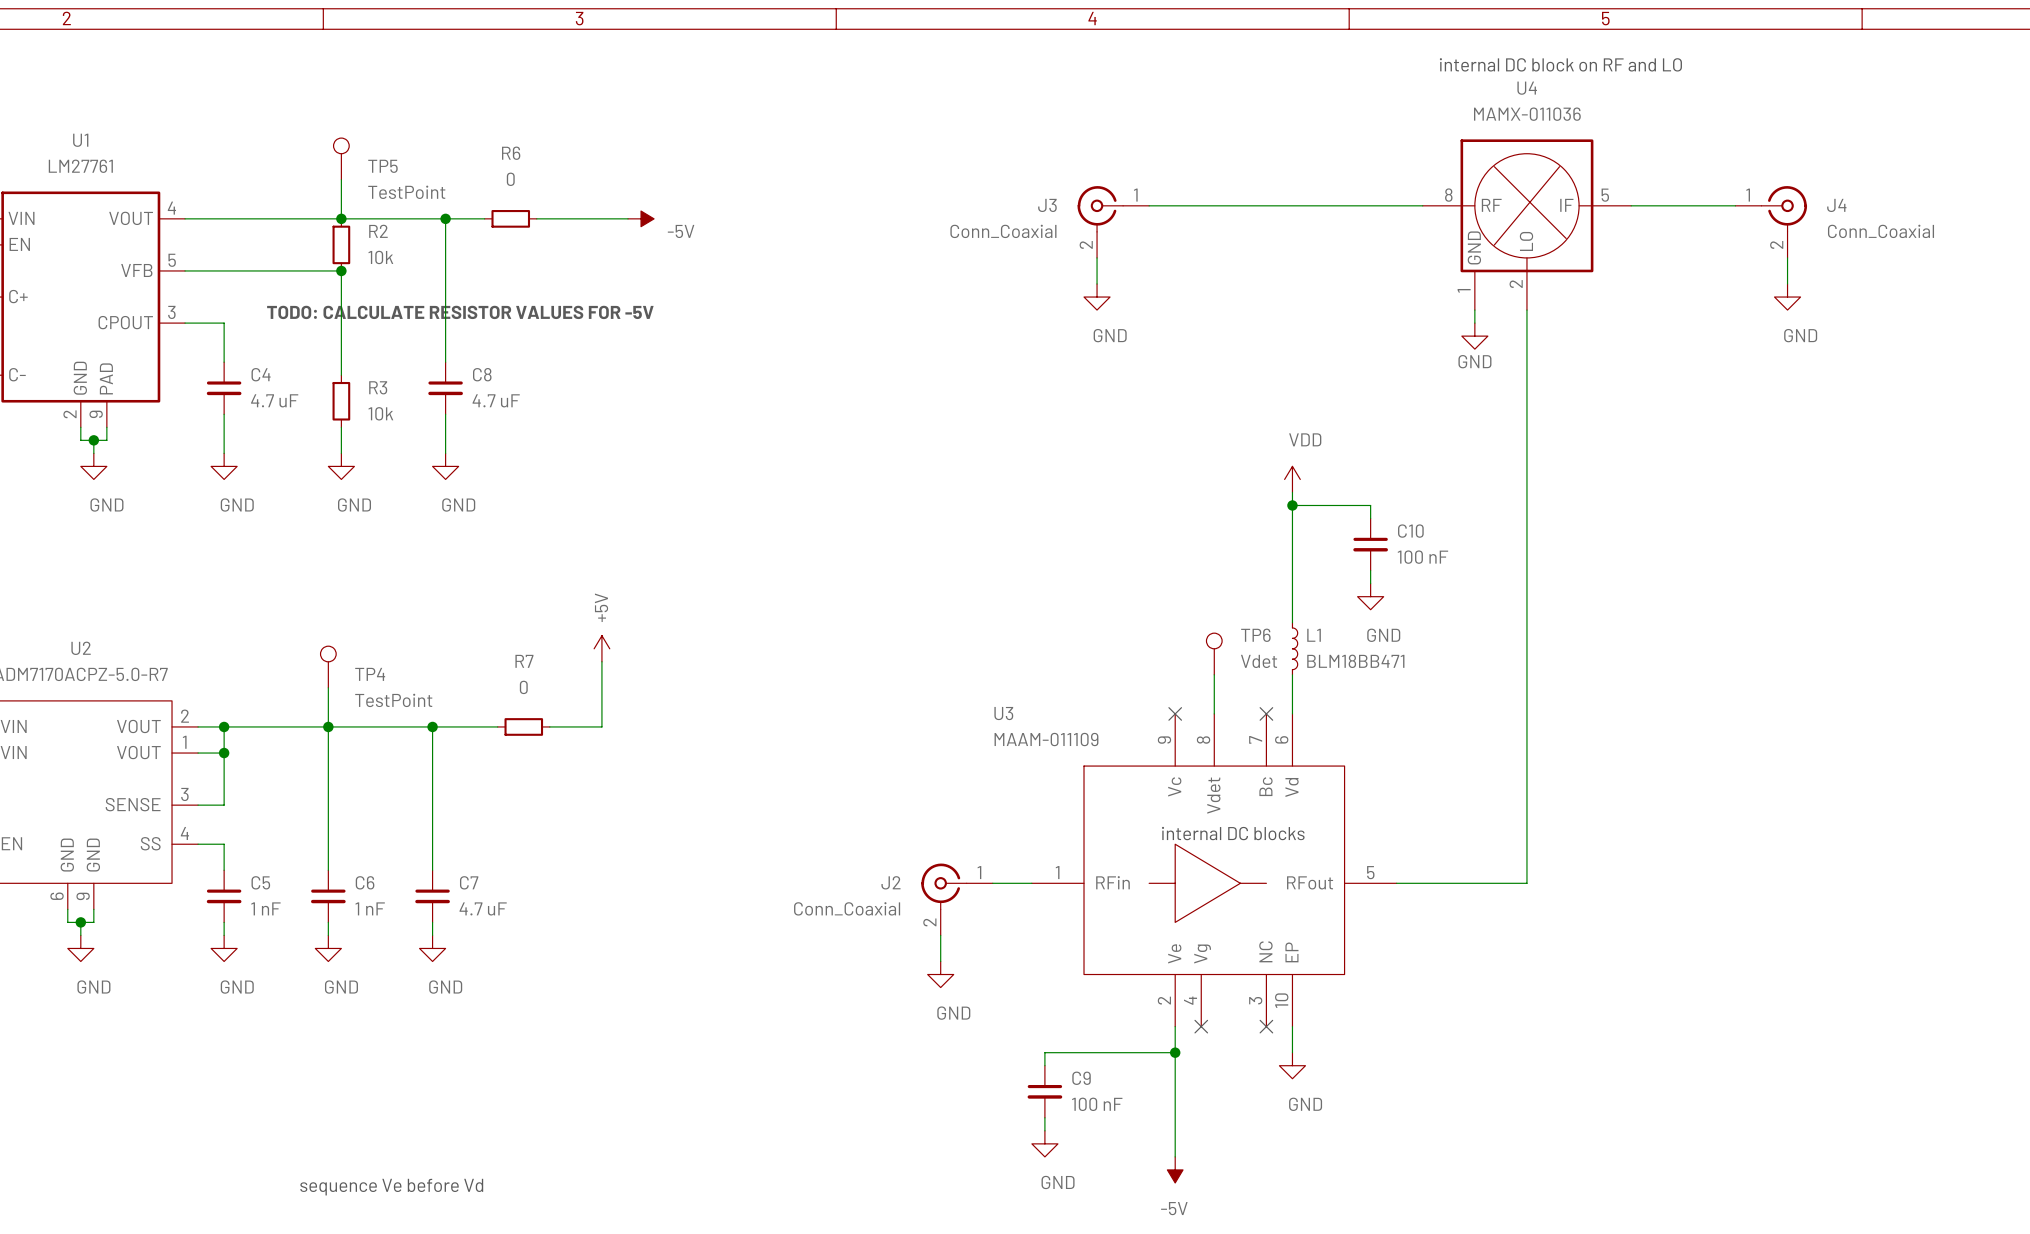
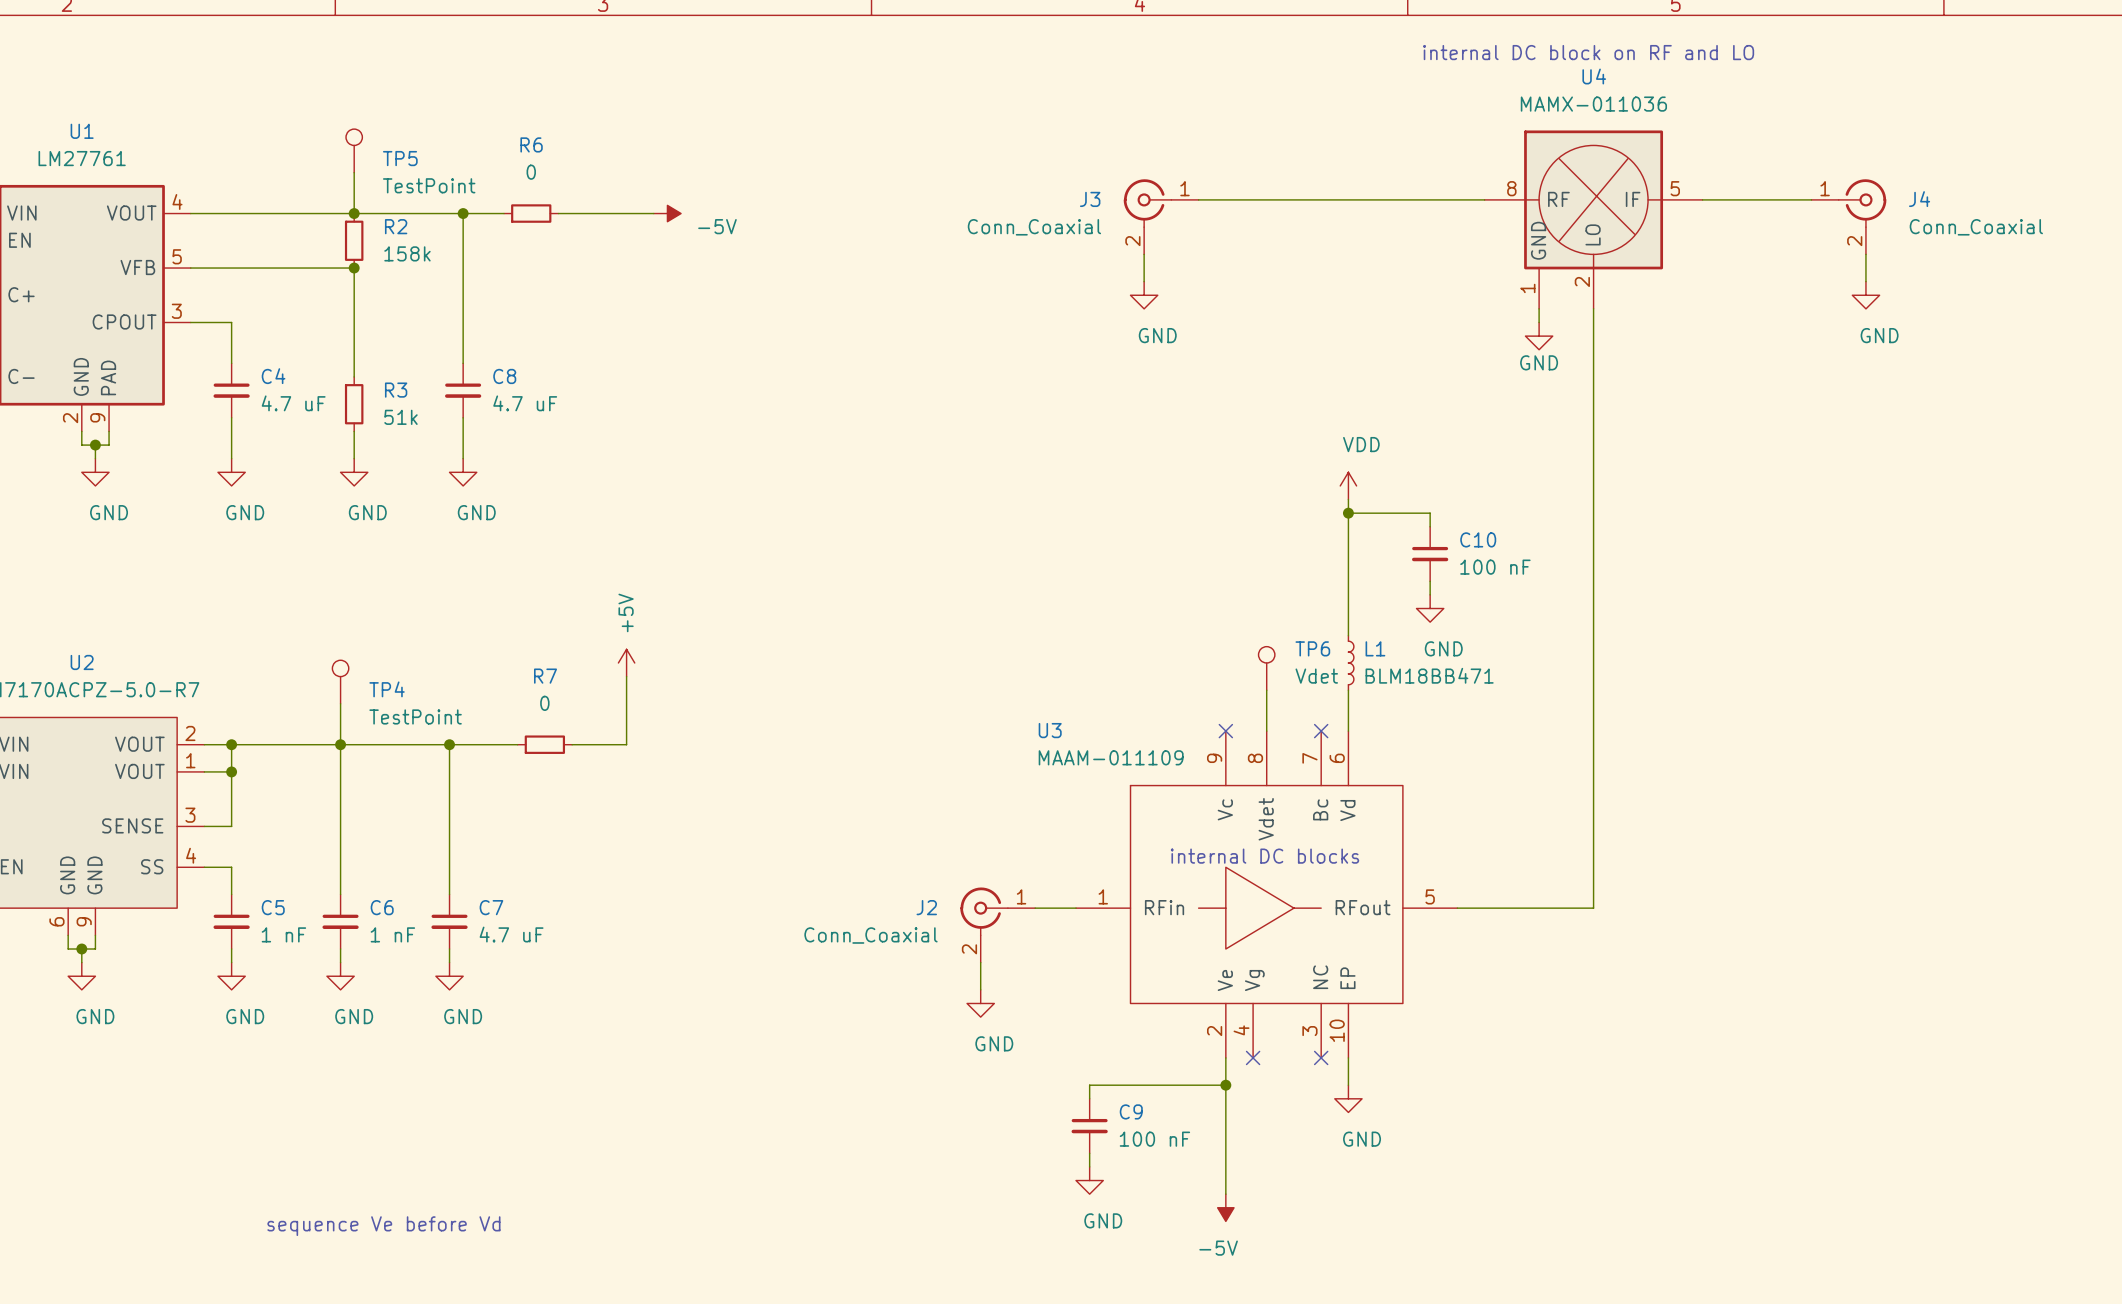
R2 value: 10k (380, 257) -> 158k (407, 253)
text: TODO: CALCULATE RESISTOR VALUES FOR -5V (460, 312) -> none
R3 value: 10k (380, 413) -> 51k (400, 417)

